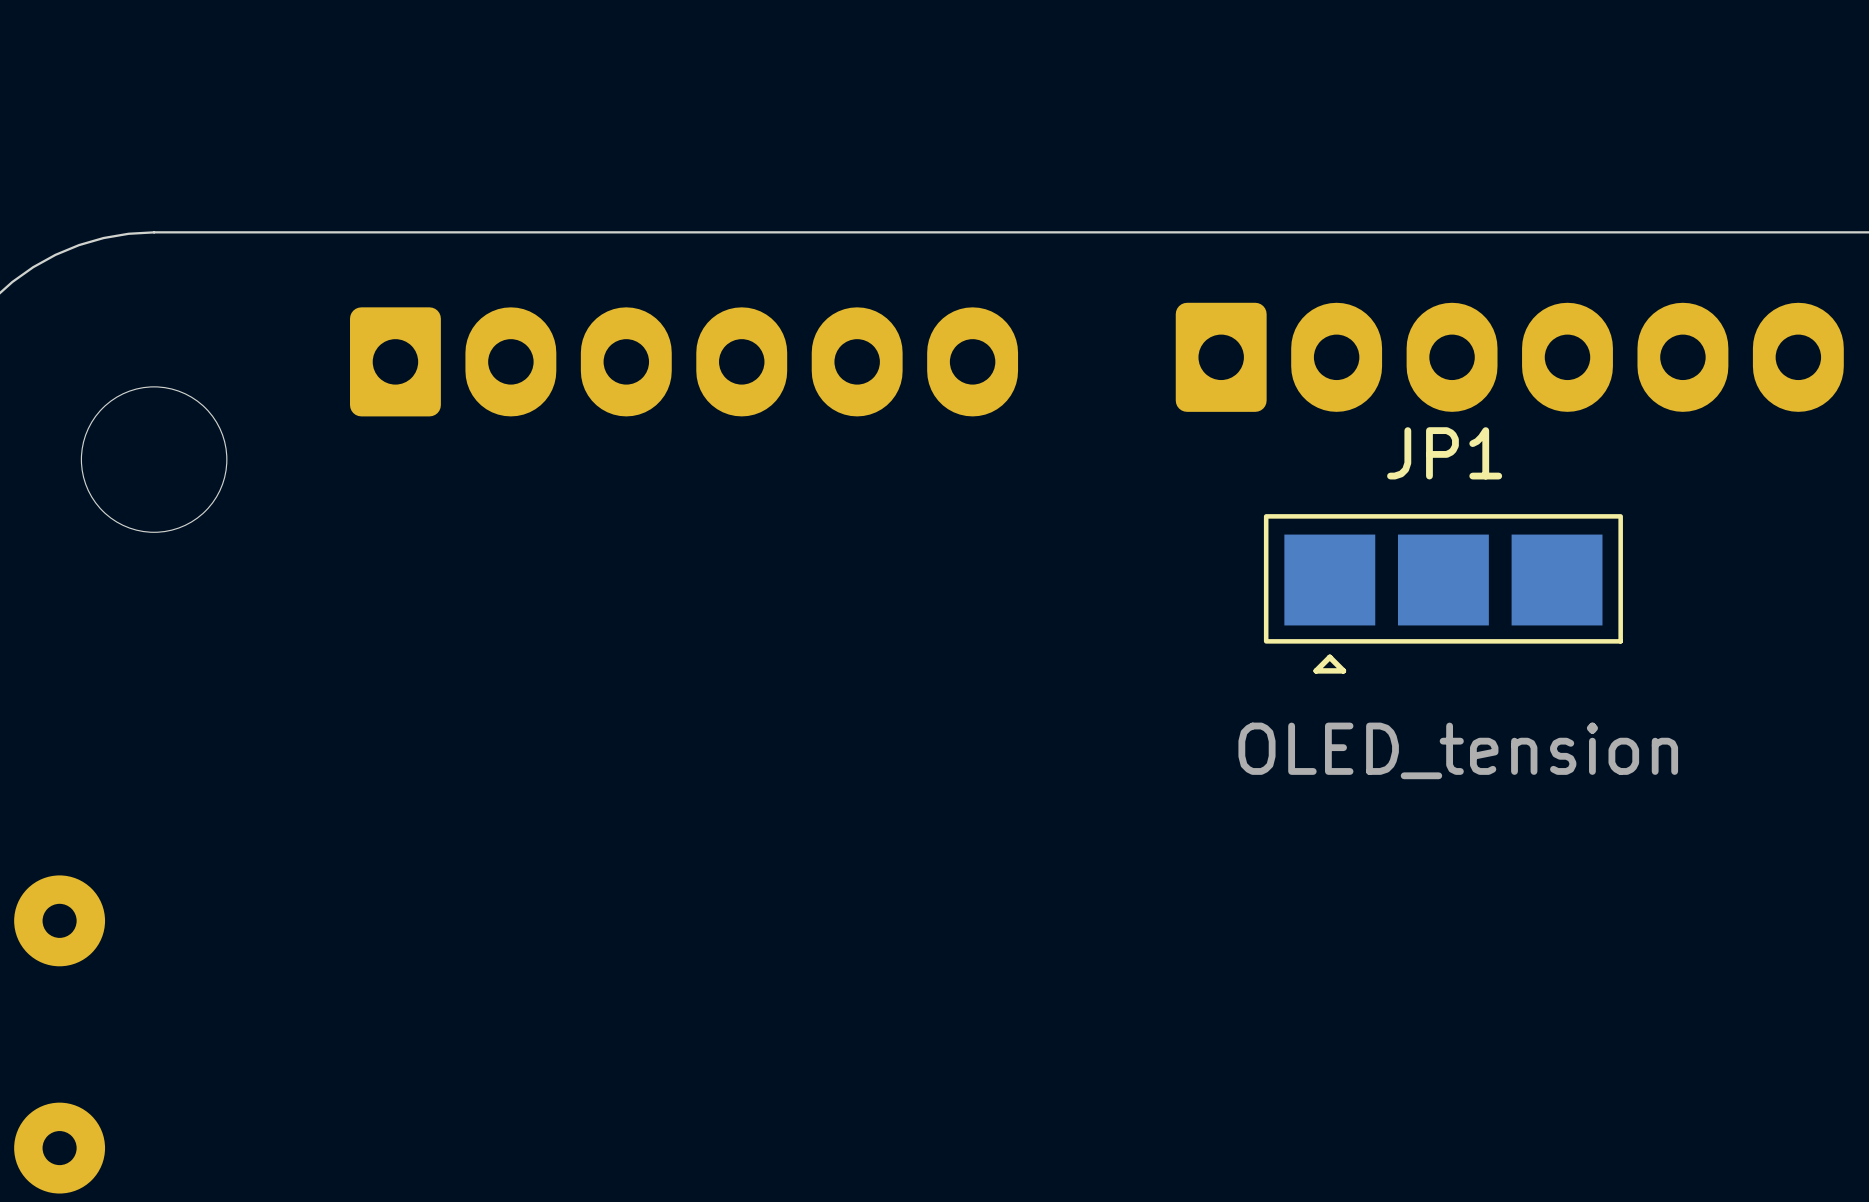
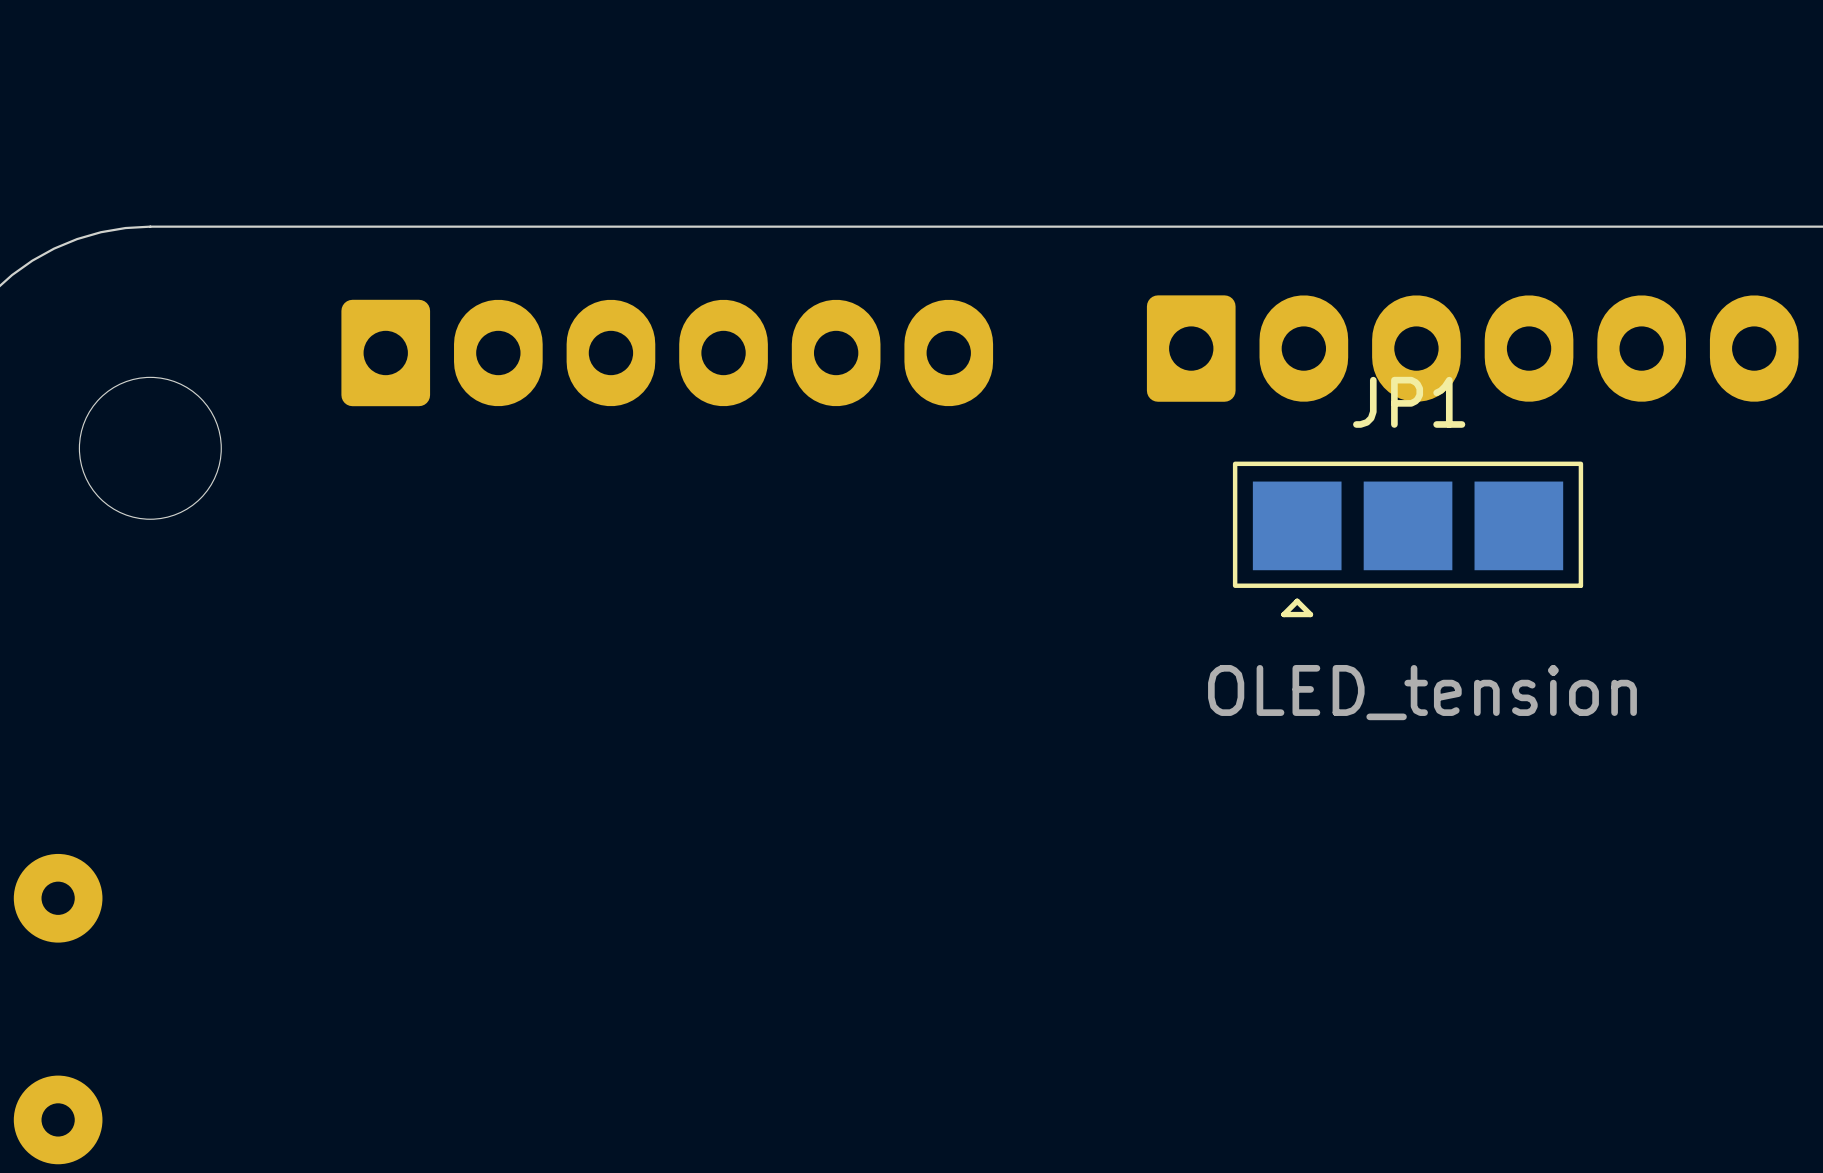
JP1 position: (1443, 593) -> (1408, 539)

